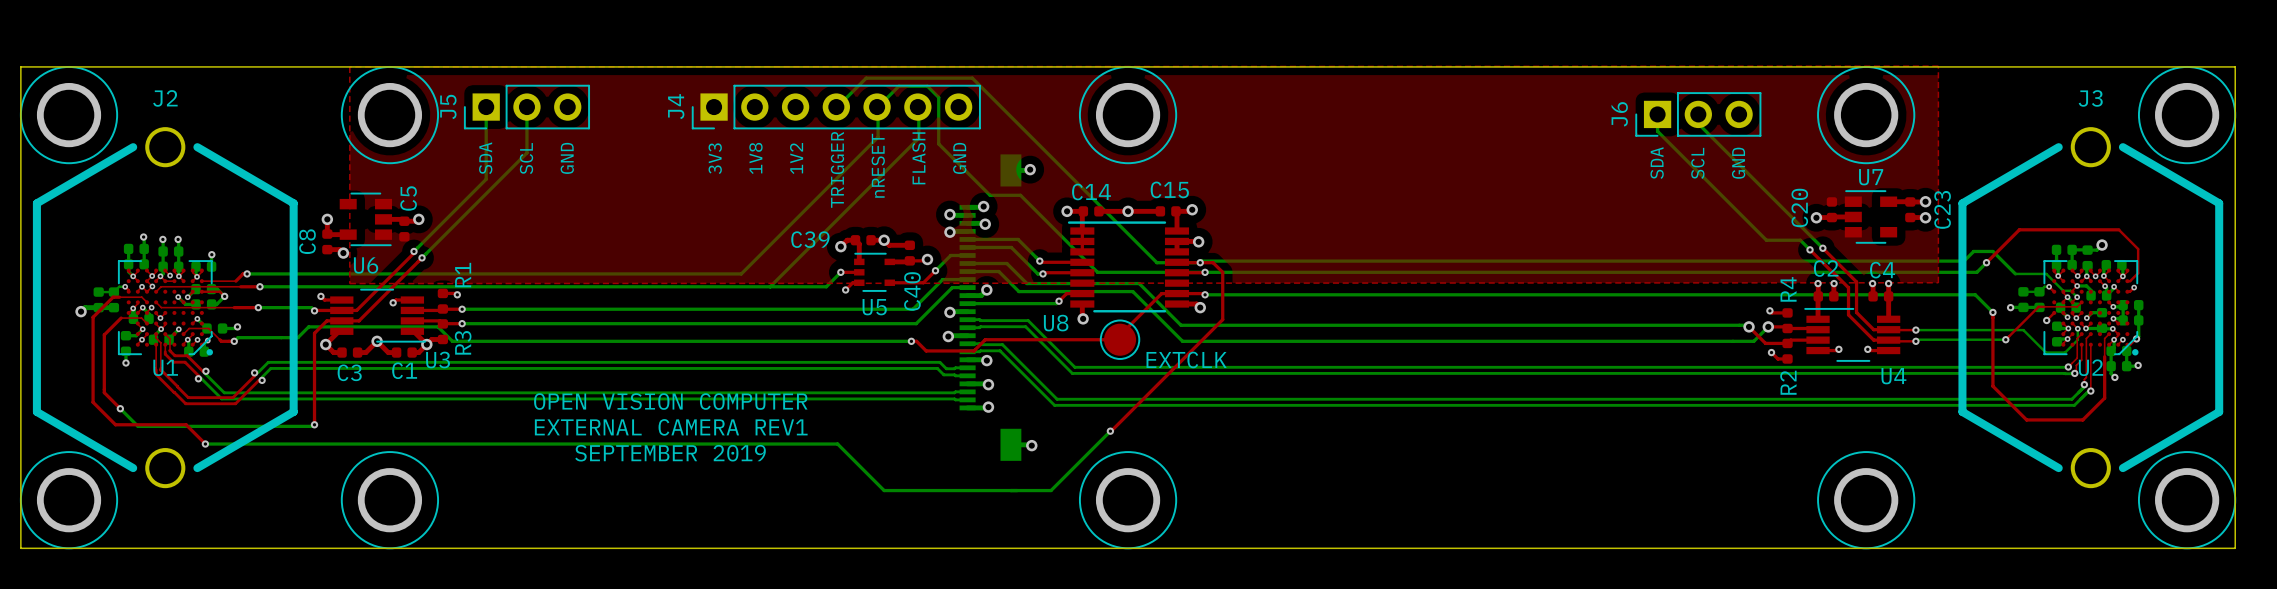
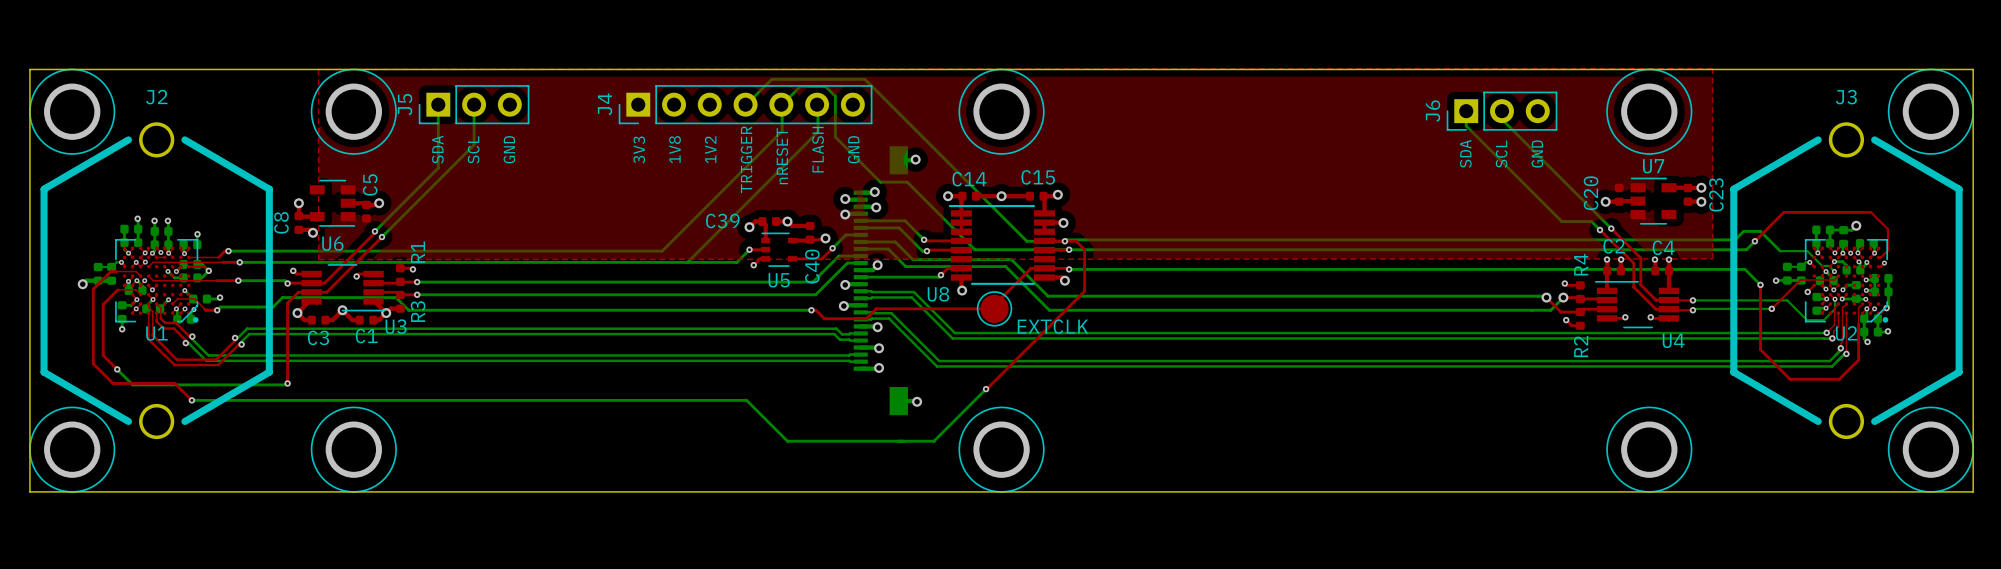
text: OPEN VISION COMPUTER (670, 401) -> none
text: EXTERNAL CAMERA REV1 (671, 427) -> none
text: SEPTEMBER 2019 (670, 453) -> none

